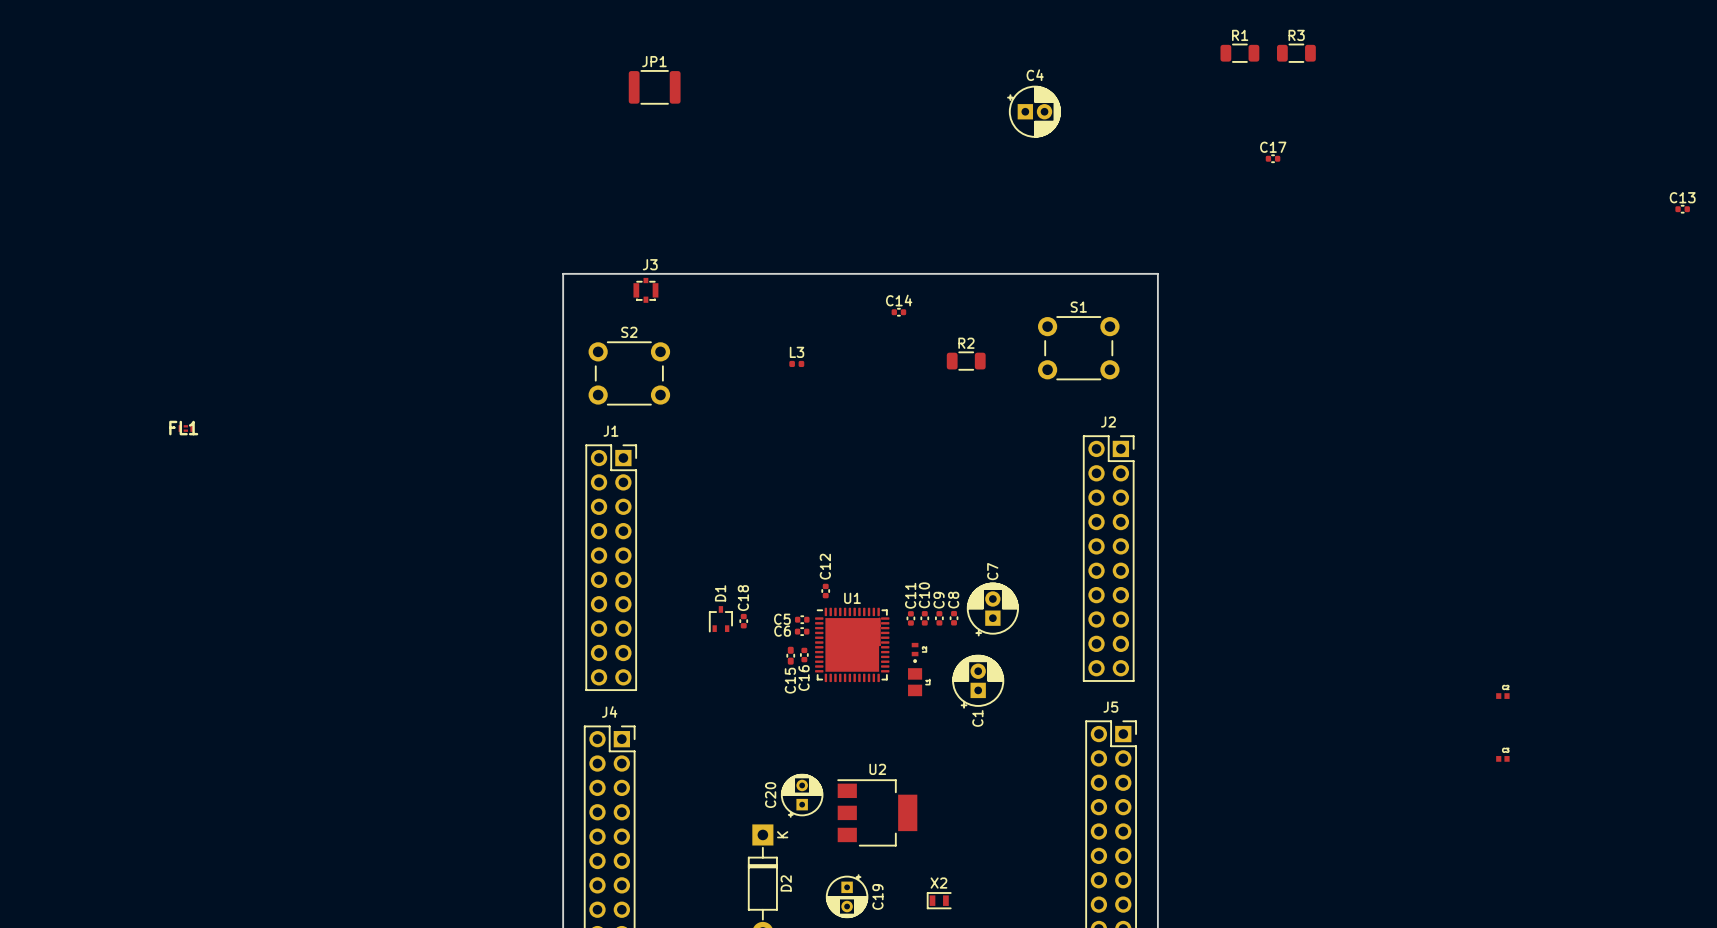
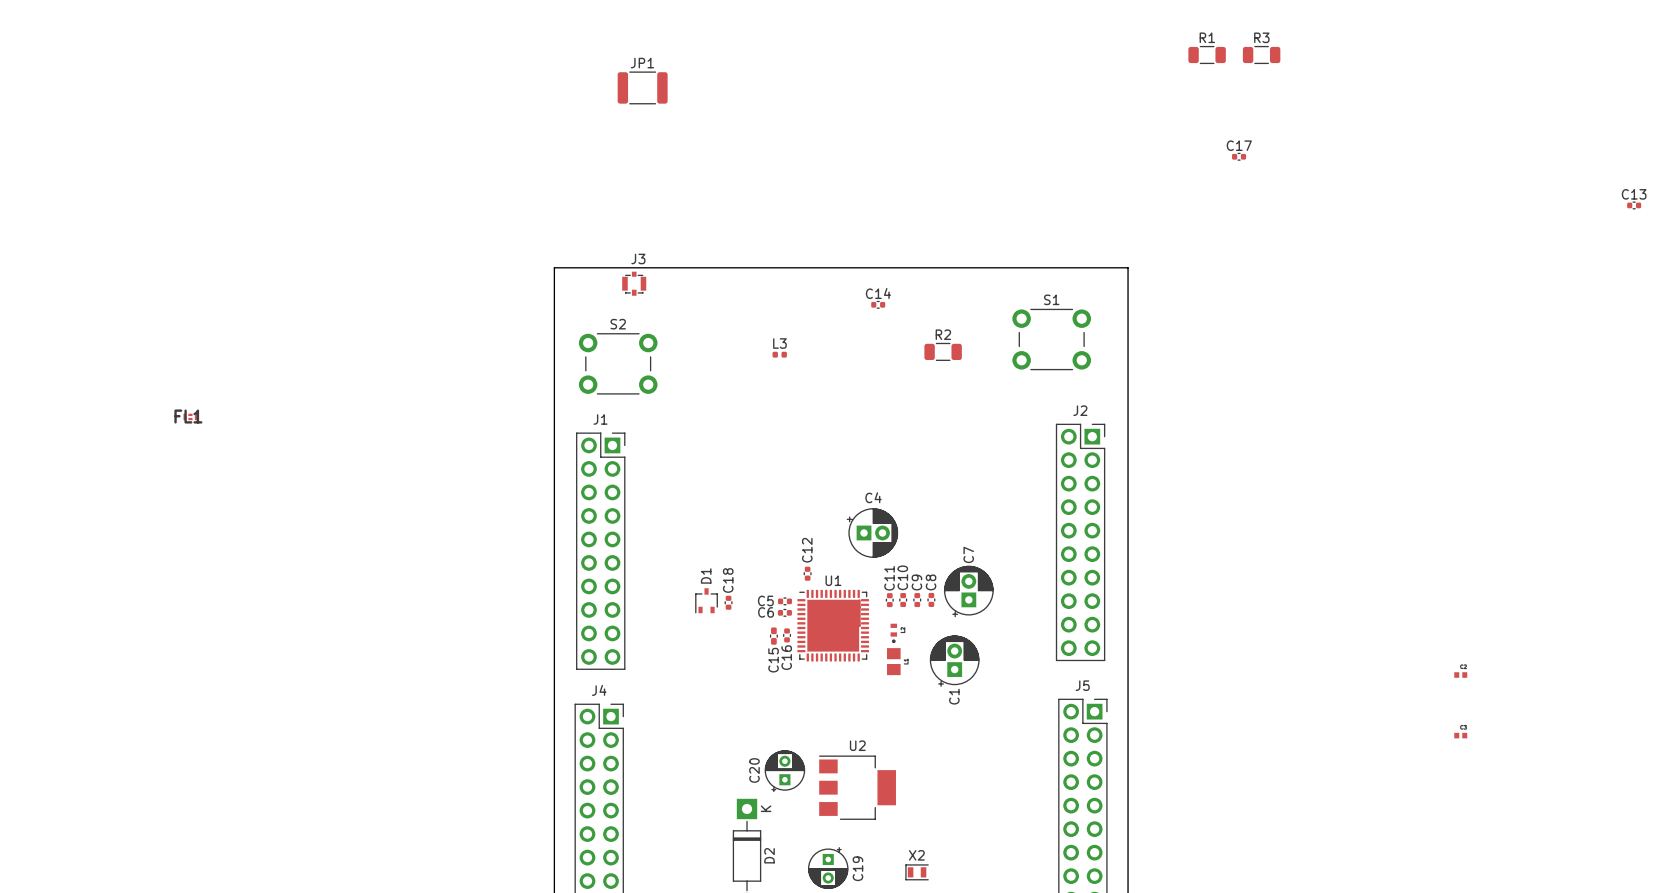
C4 position: (1034, 111) -> (872, 532)

